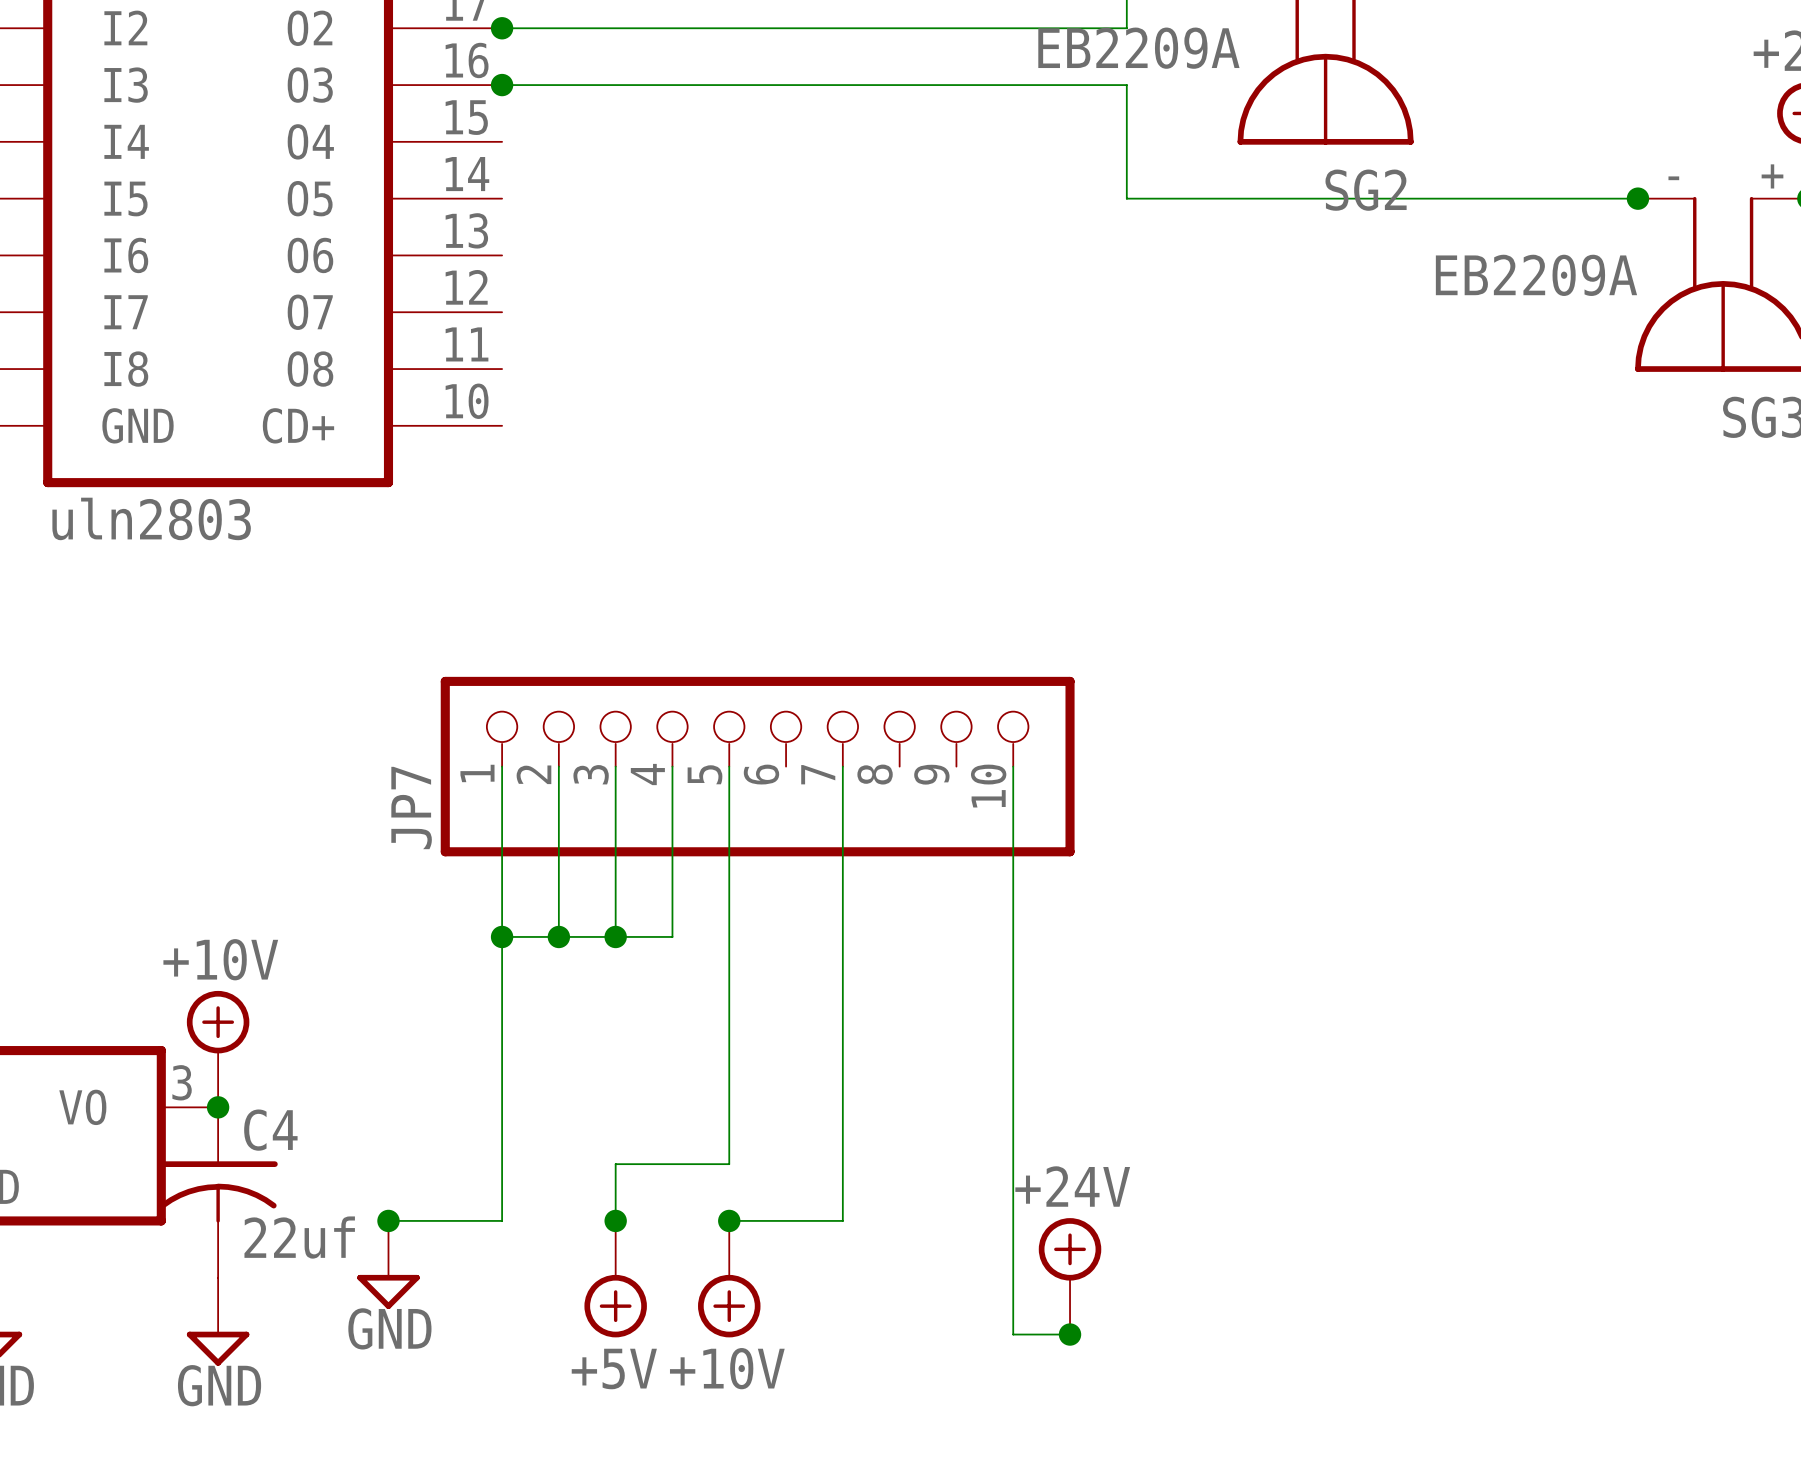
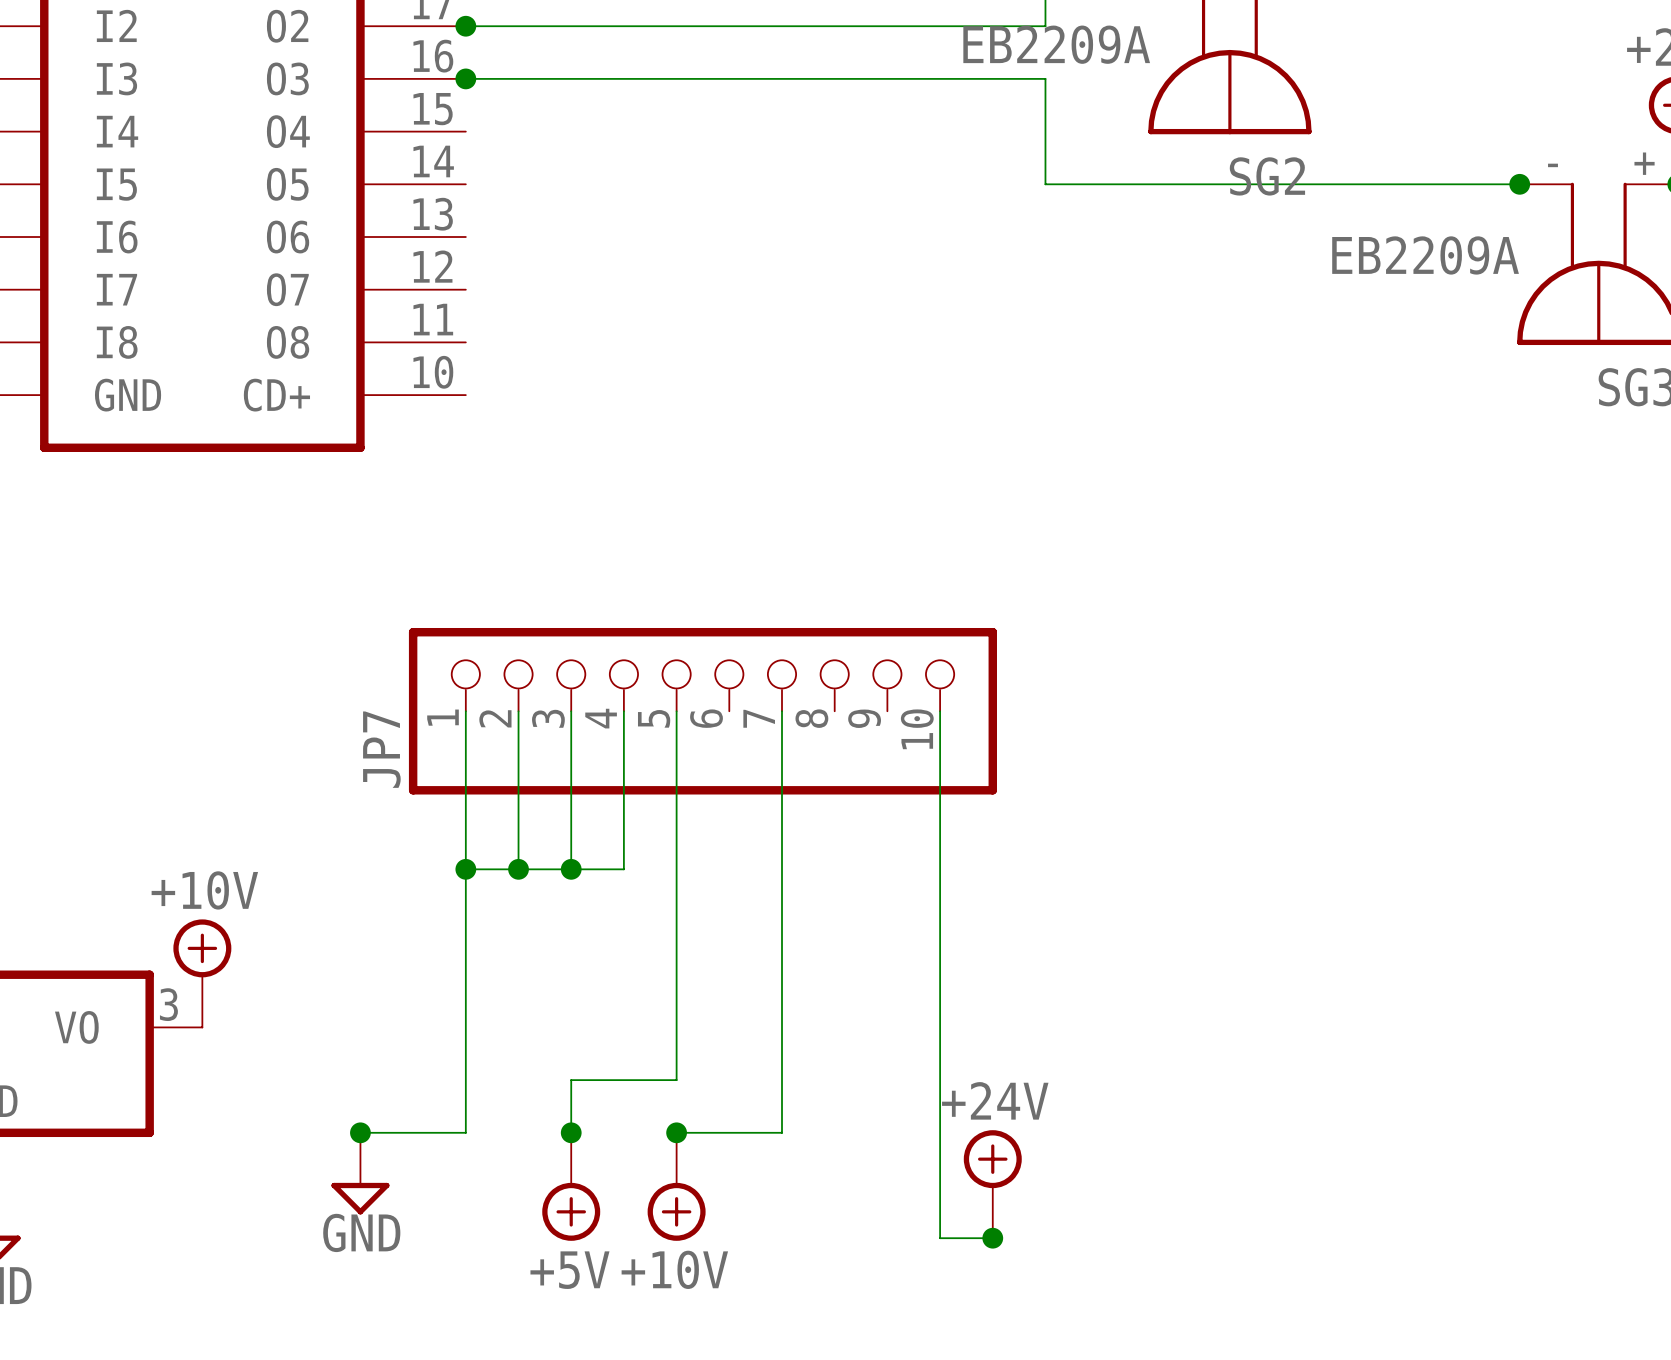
part value: uln2803 (151, 518) -> none
junction: (218, 1107) -> none
C4: 22uf (218, 1192) -> none
power symbol: GND (218, 1321) -> none

